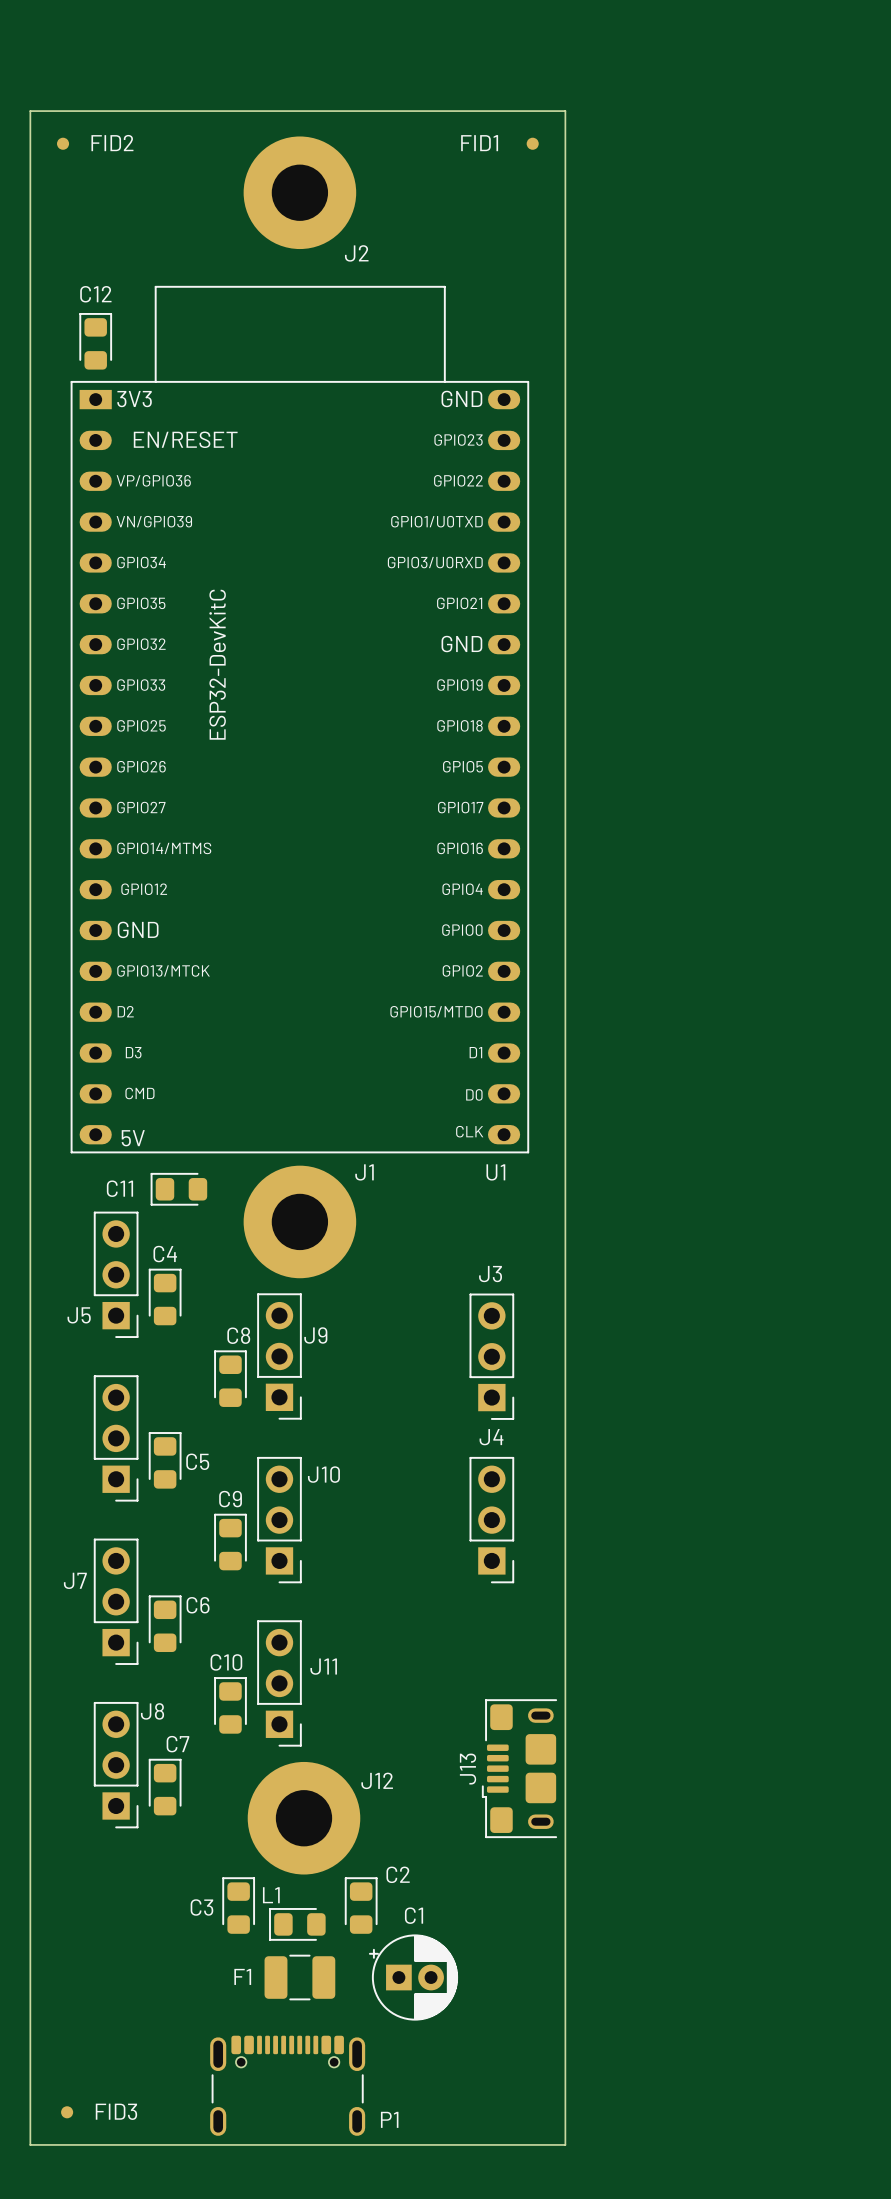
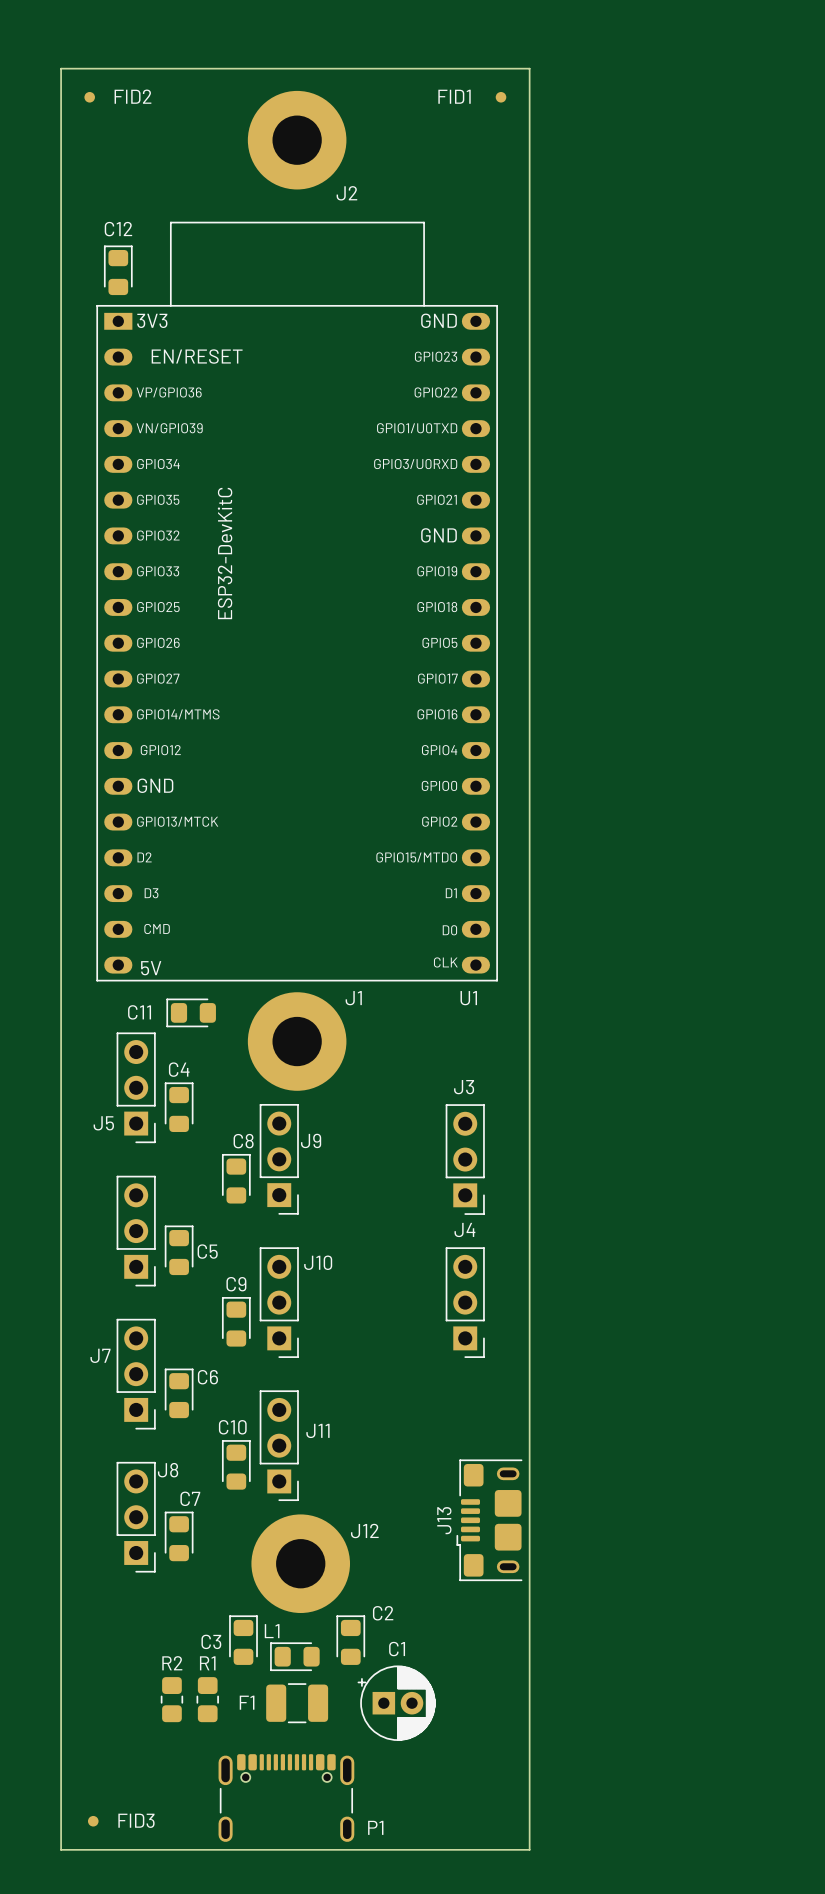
R2: none -> (171, 1699)
R1: none -> (207, 1699)

